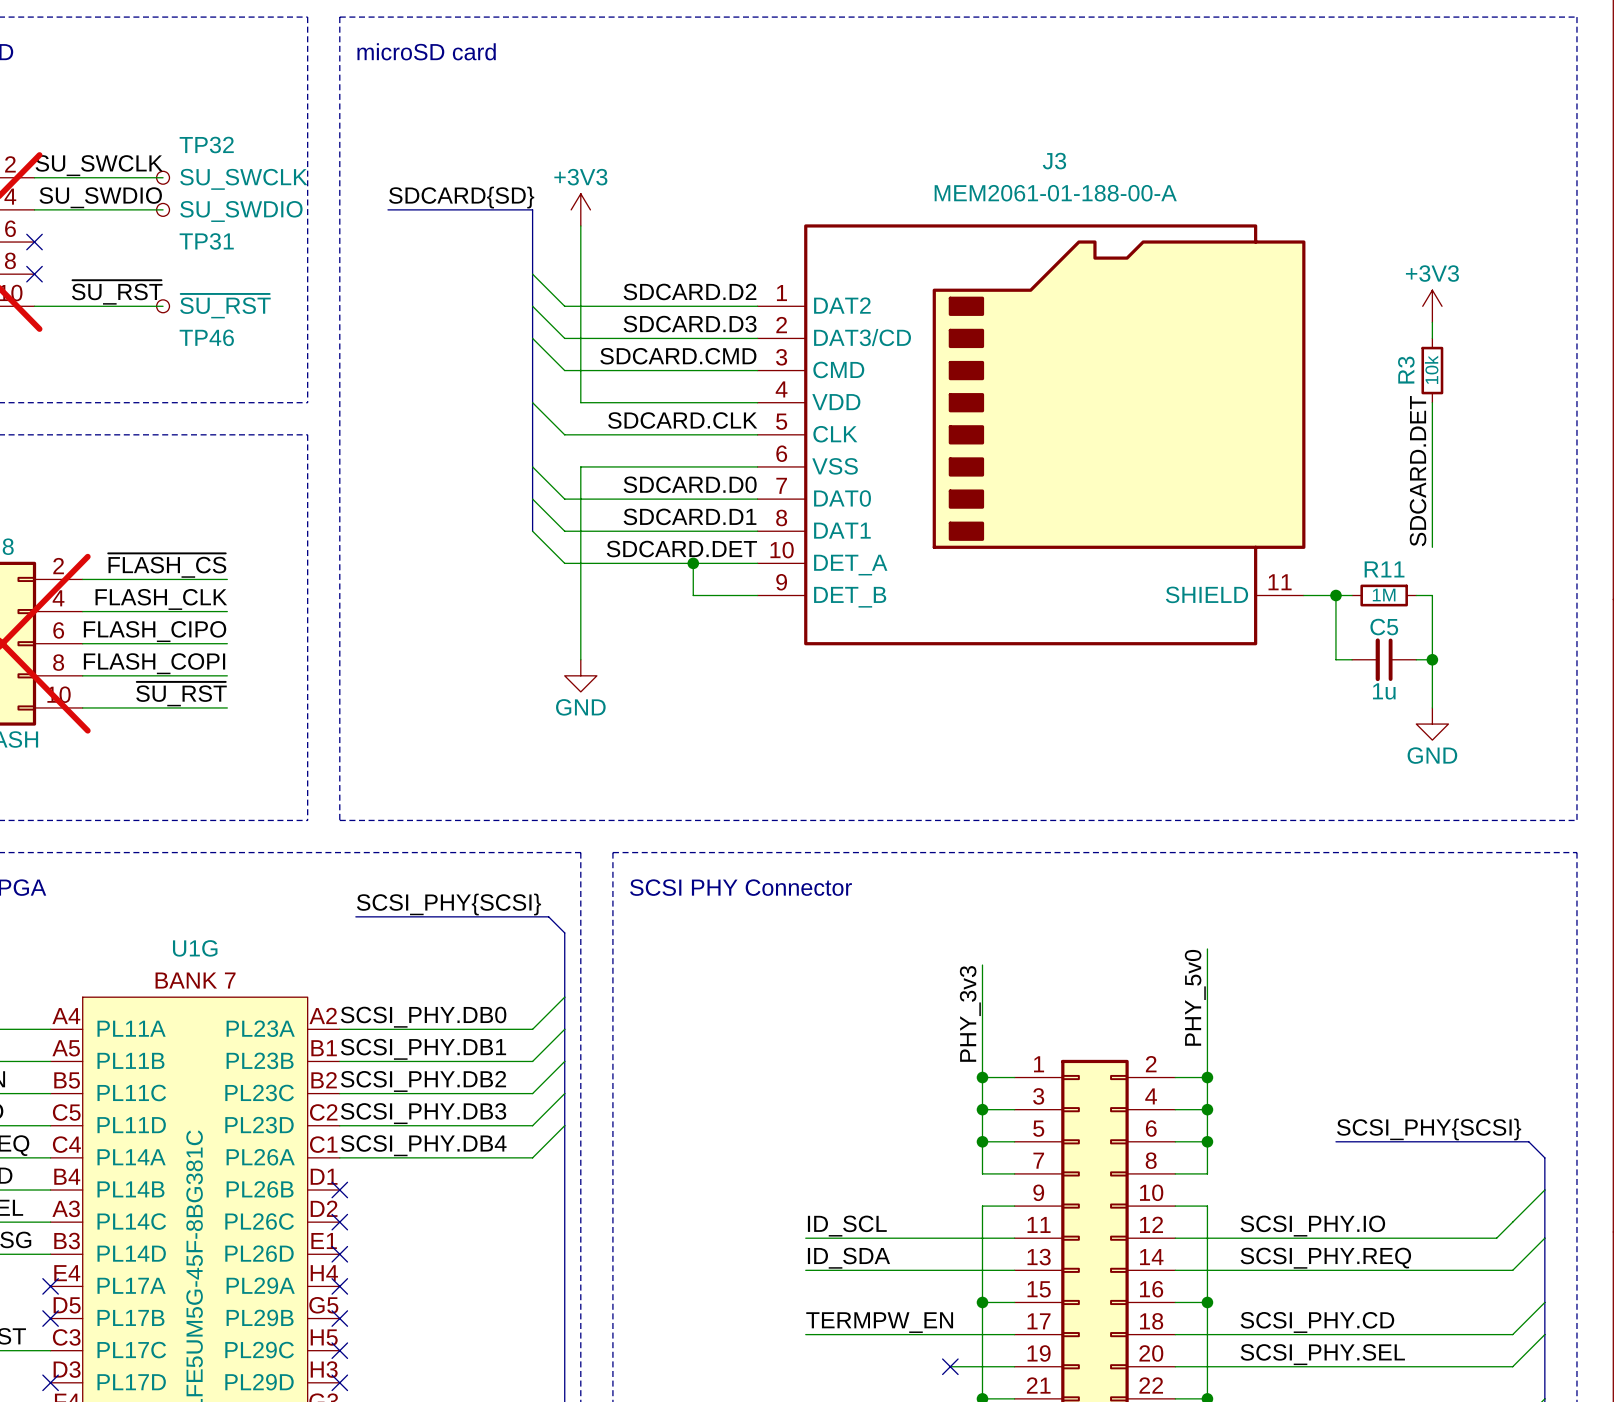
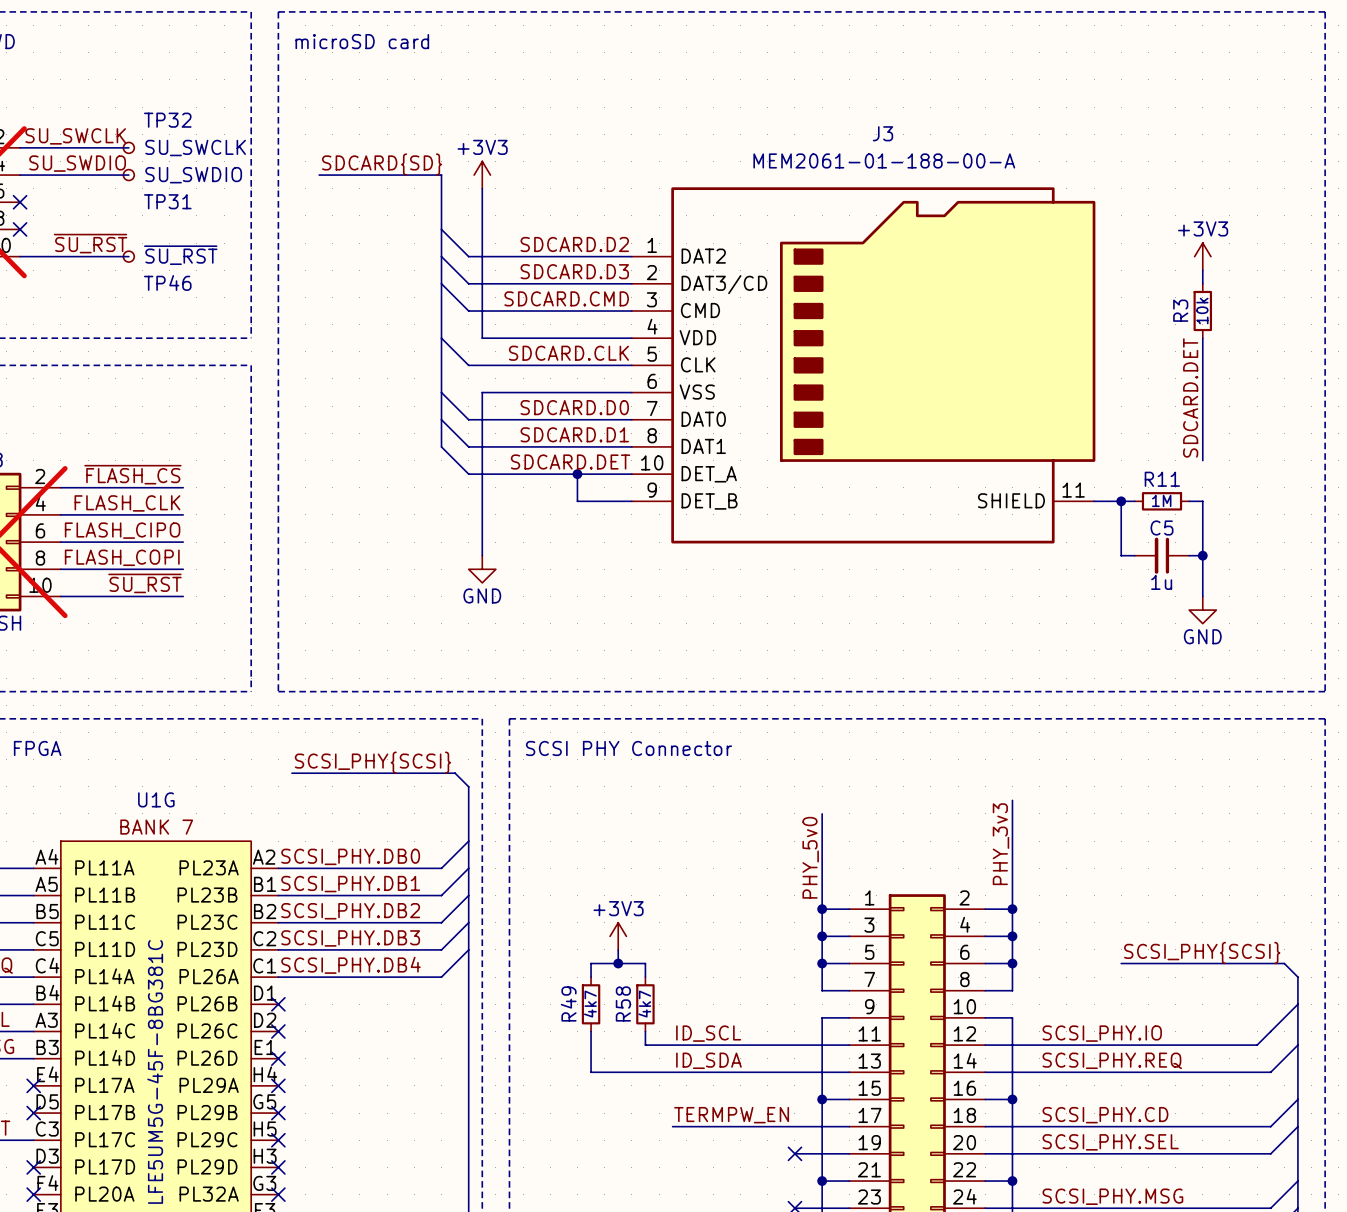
label: PHY_5v0 (1195, 997) -> PHY_3v3 (1000, 844)
label: PHY_3v3 (970, 1013) -> PHY_5v0 (810, 857)
power symbol: none -> +3V3 (618, 936)
wire: none -> (618, 949) (618, 963)
junction: none -> (618, 963)
wire: none -> (591, 977) (591, 963) (645, 963) (645, 977)
R49: none -> 4k7 (591, 1004)
R58: none -> 4k7 (645, 1004)
wire: none -> (591, 1031) (591, 1072) (672, 1072)
wire: none -> (645, 1031) (645, 1045) (672, 1045)

